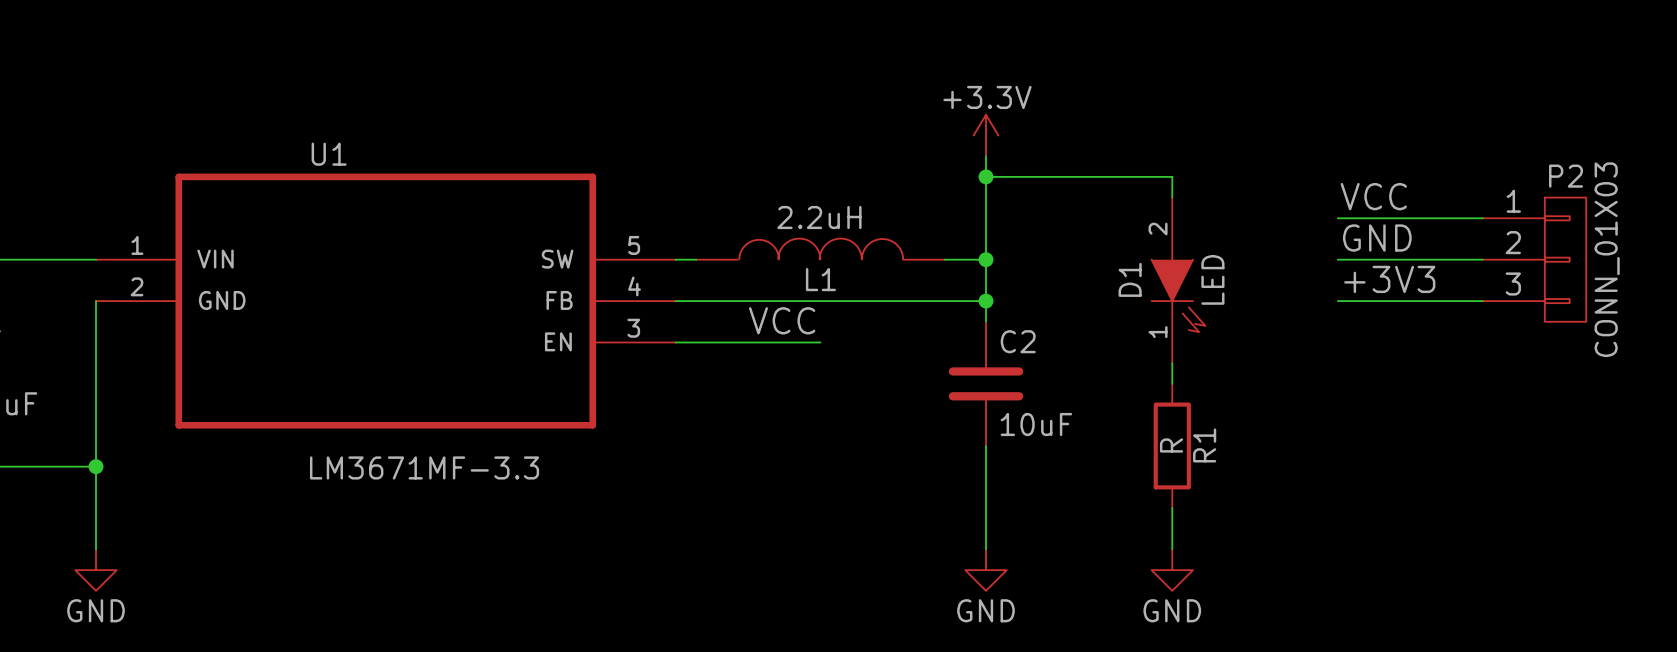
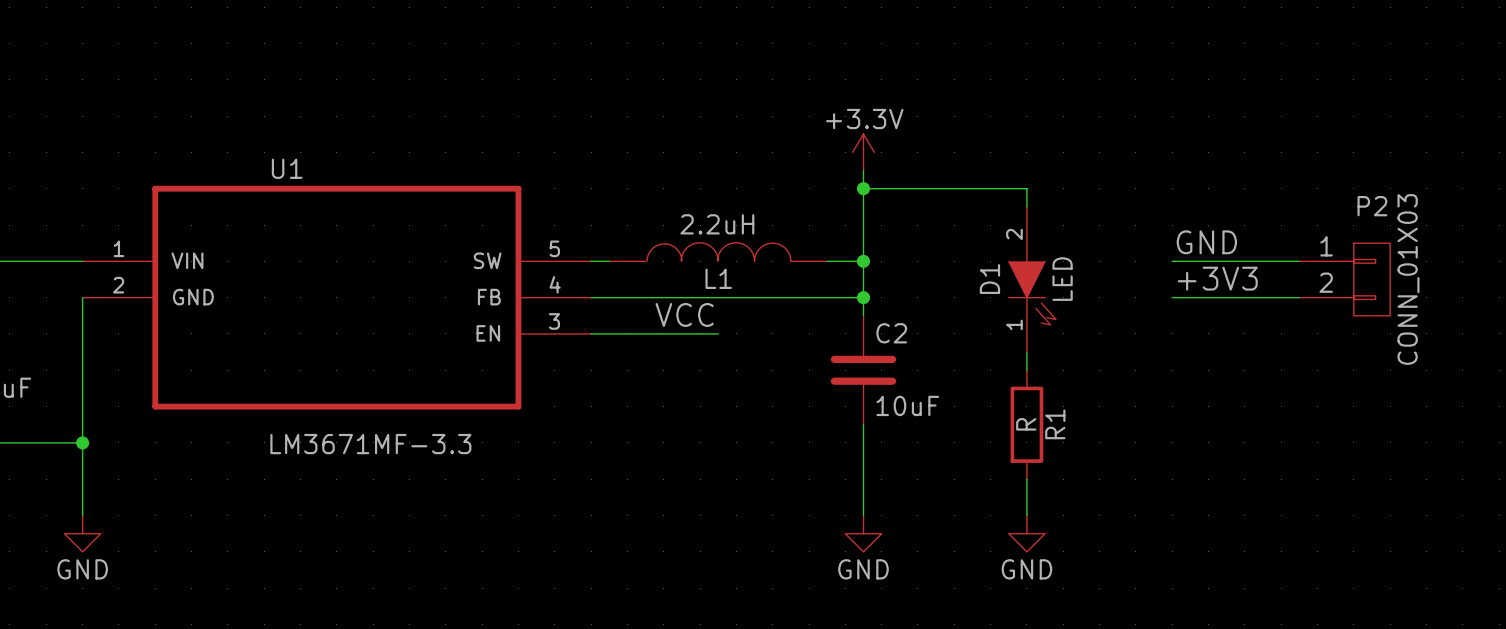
label: VCC (1373, 196) -> none
P2 symbol: [1482, 197, 1587, 322] -> [1299, 243, 1391, 316]
wire: (1337, 218) (1482, 218) -> none

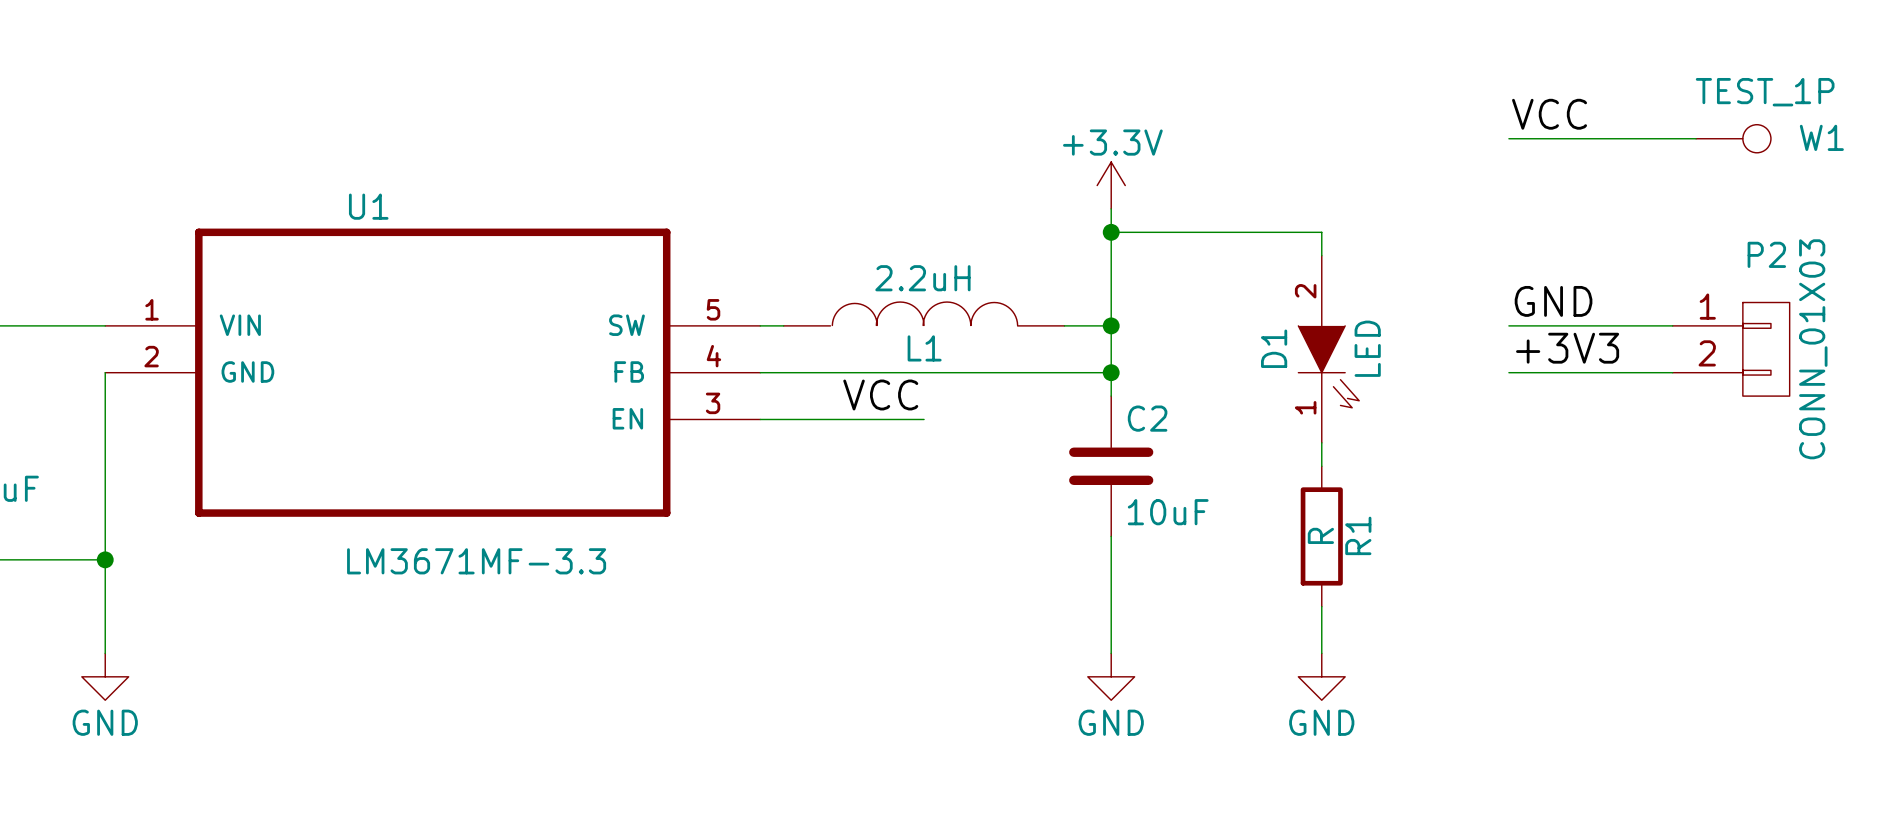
label: none -> VCC (1549, 114)
wire: none -> (1508, 138) (1696, 138)
W1: none -> TEST_1P (1733, 138)

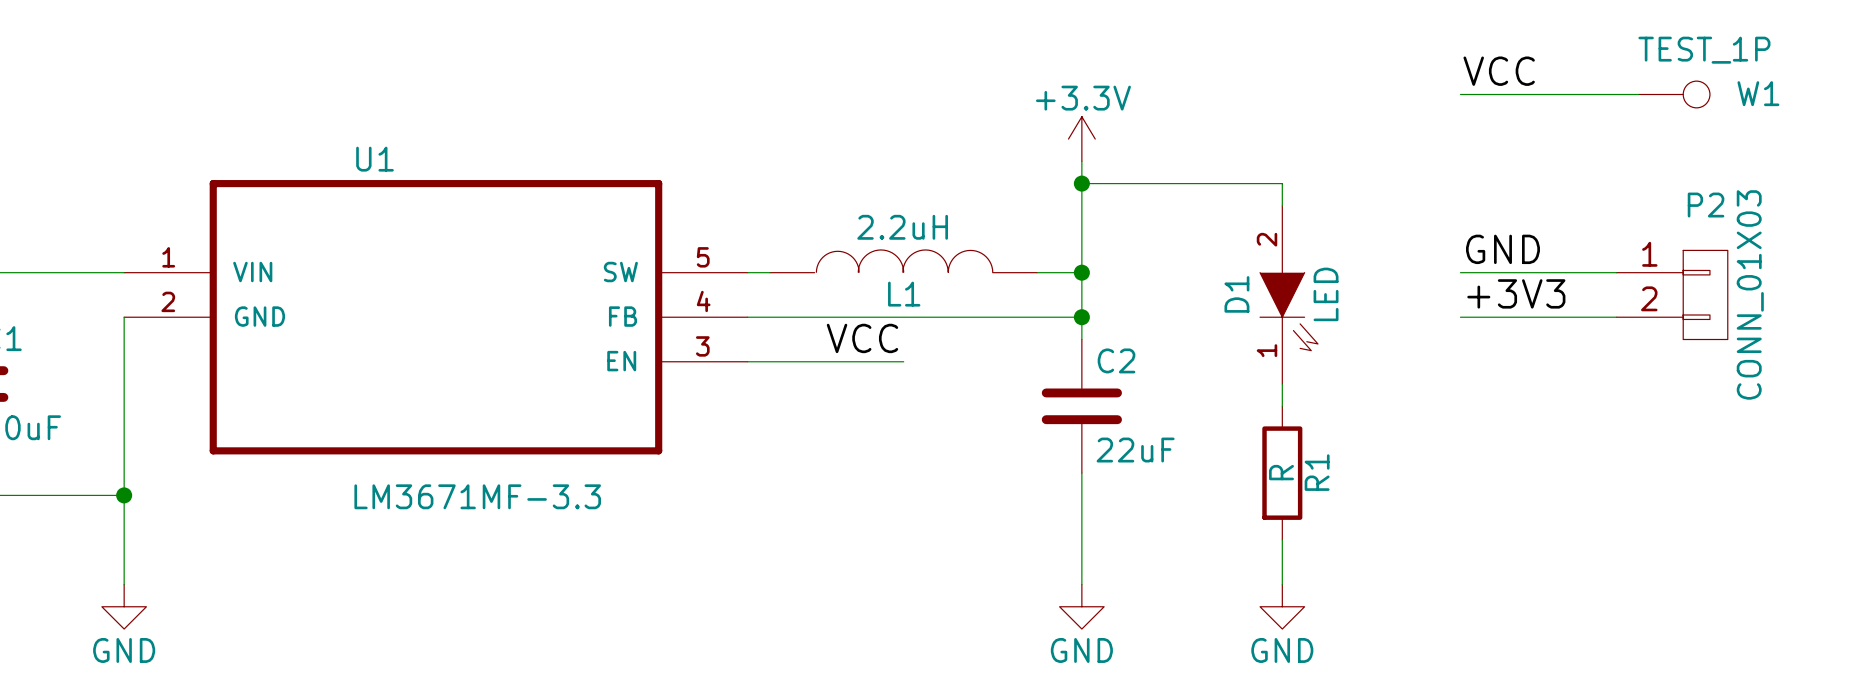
C2 value: 10uF (1168, 512) -> 22uF (1135, 450)

